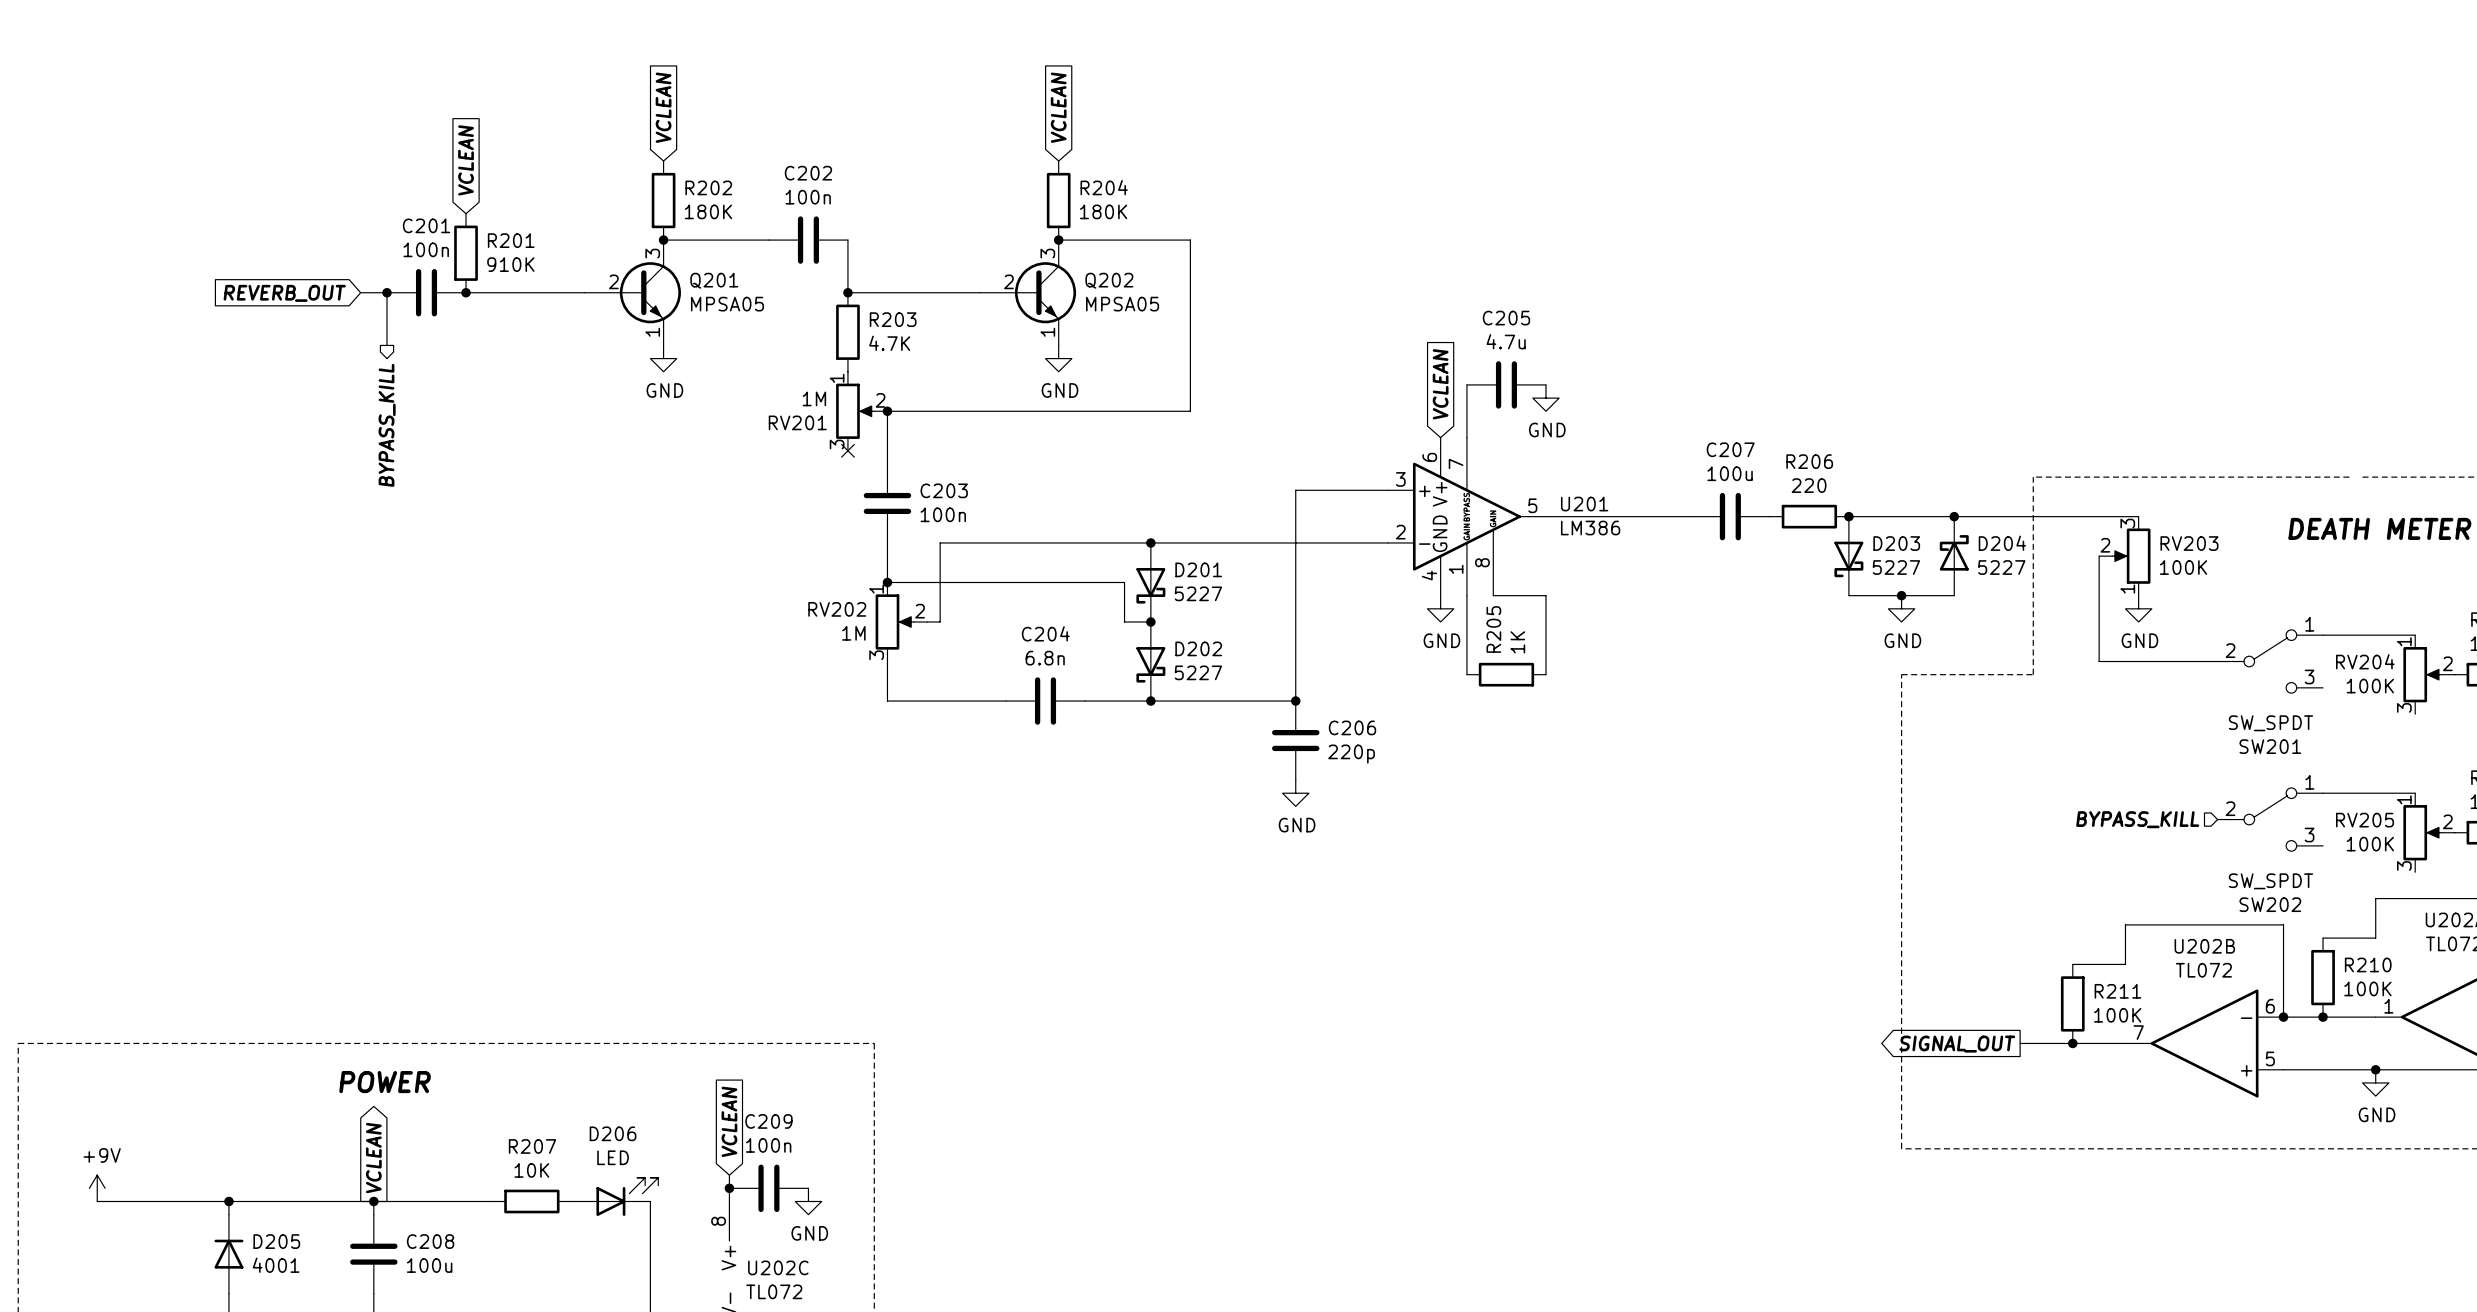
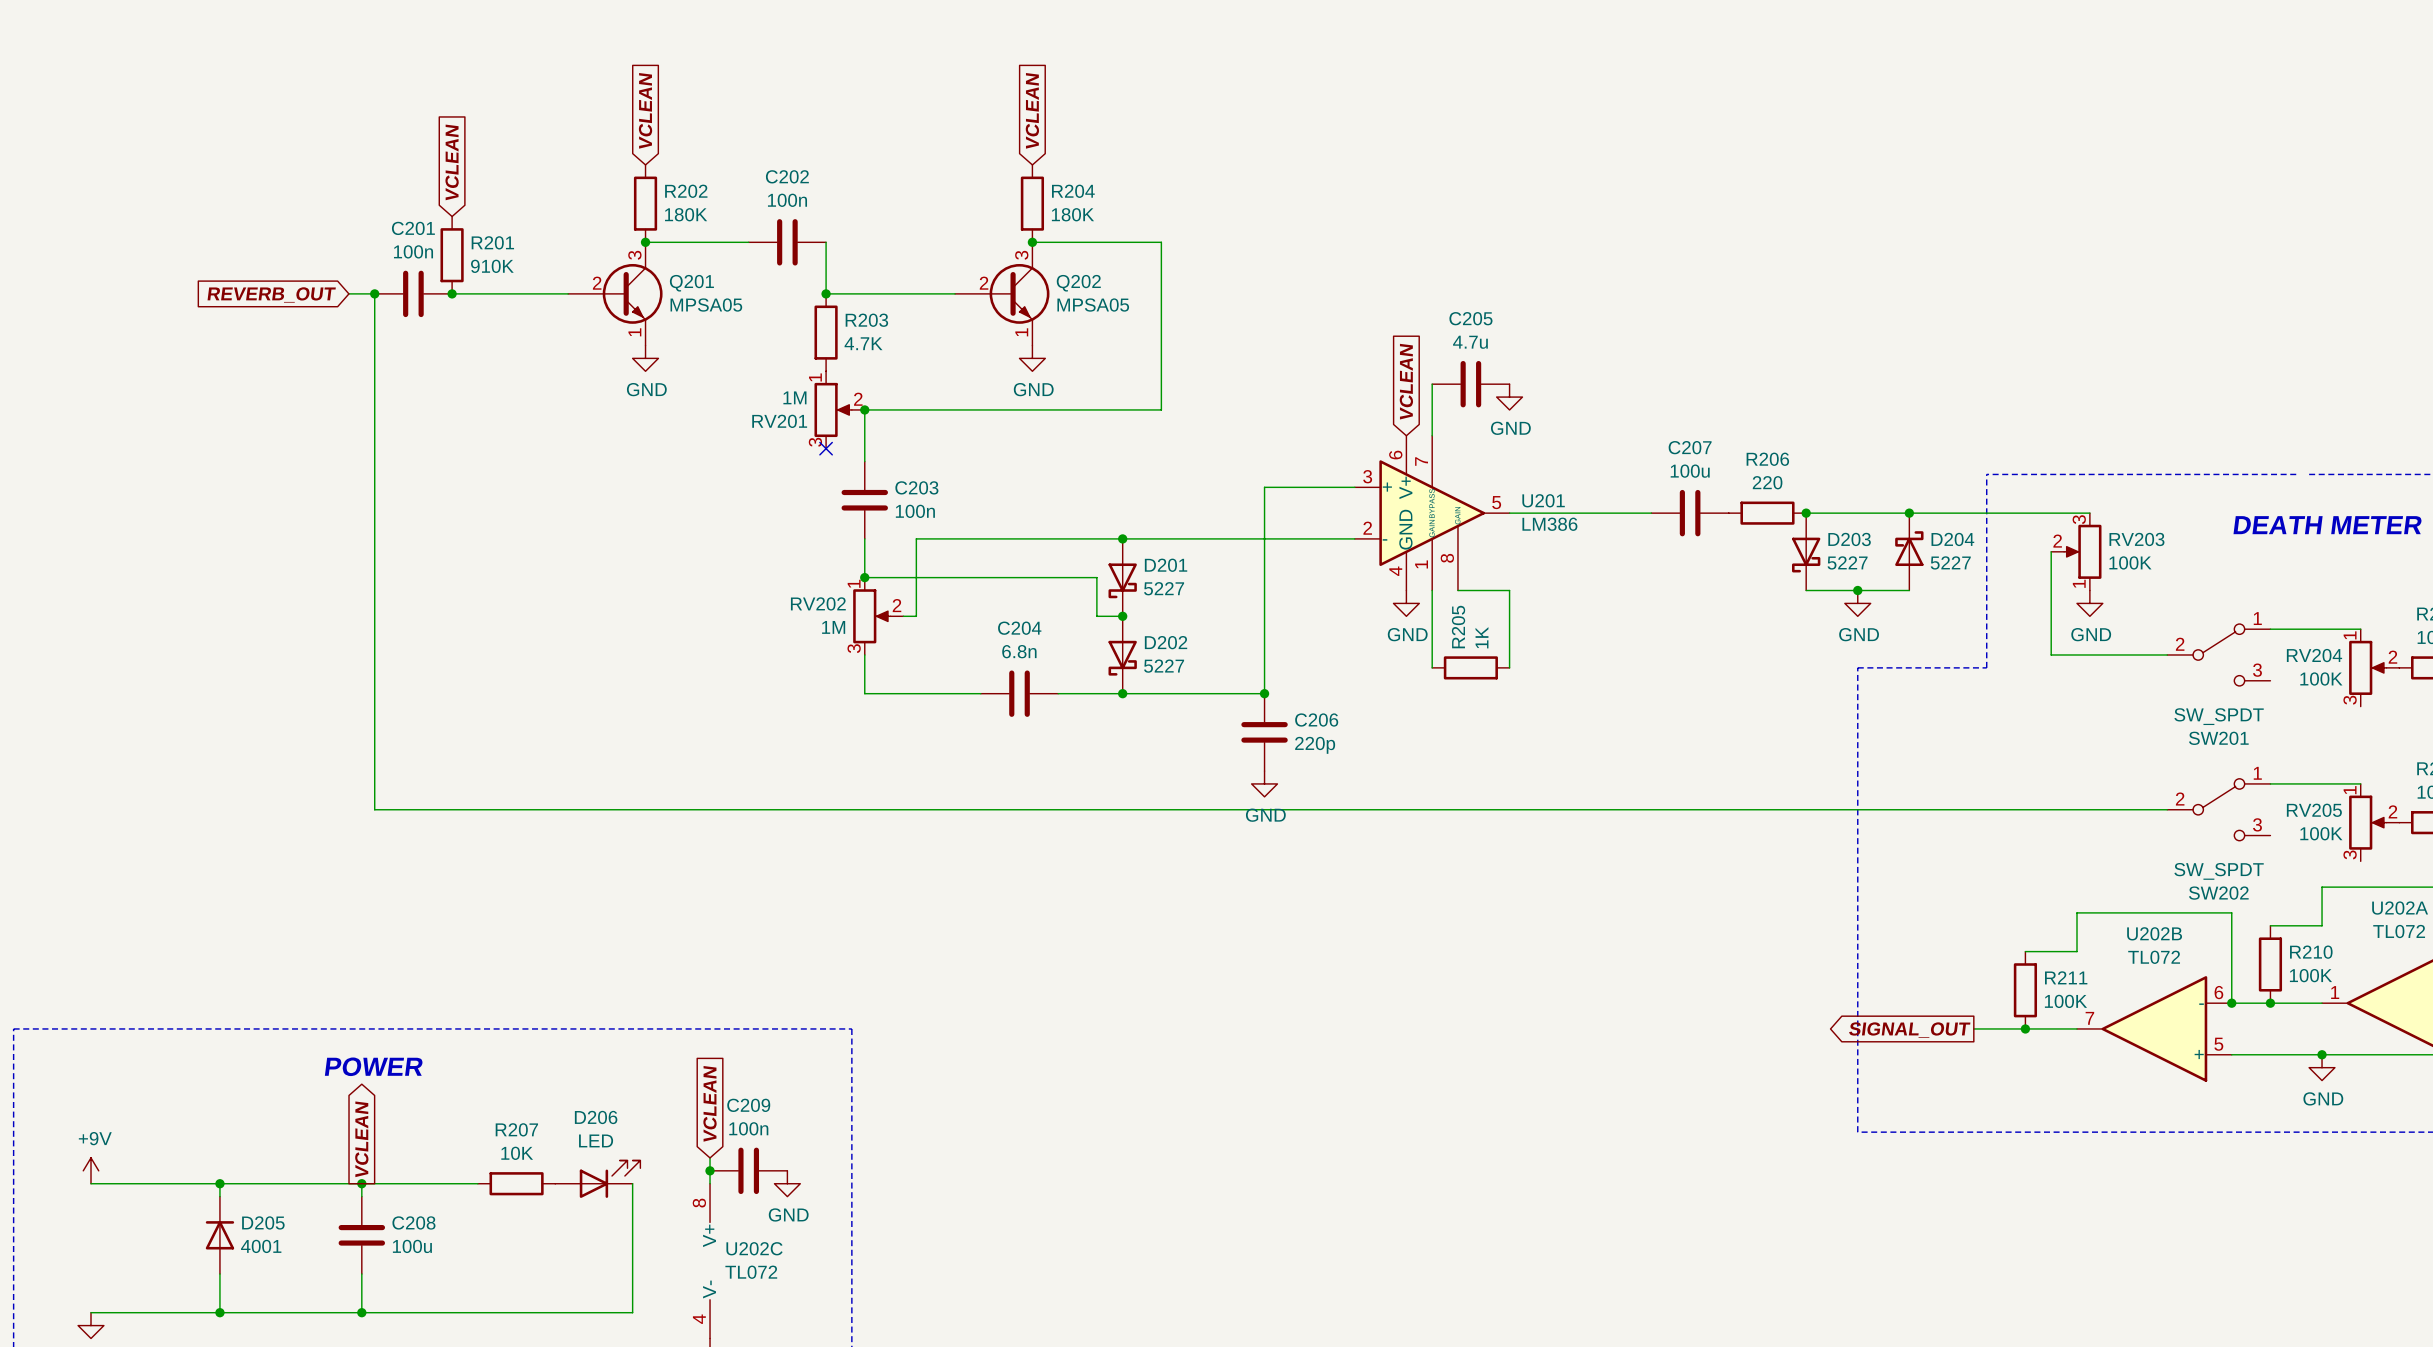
wire: none -> (374, 345) (374, 809) (2167, 809)
hierarchical label: BYPASS_KILL (387, 425) -> none
hierarchical label: BYPASS_KILL (2137, 819) -> none

